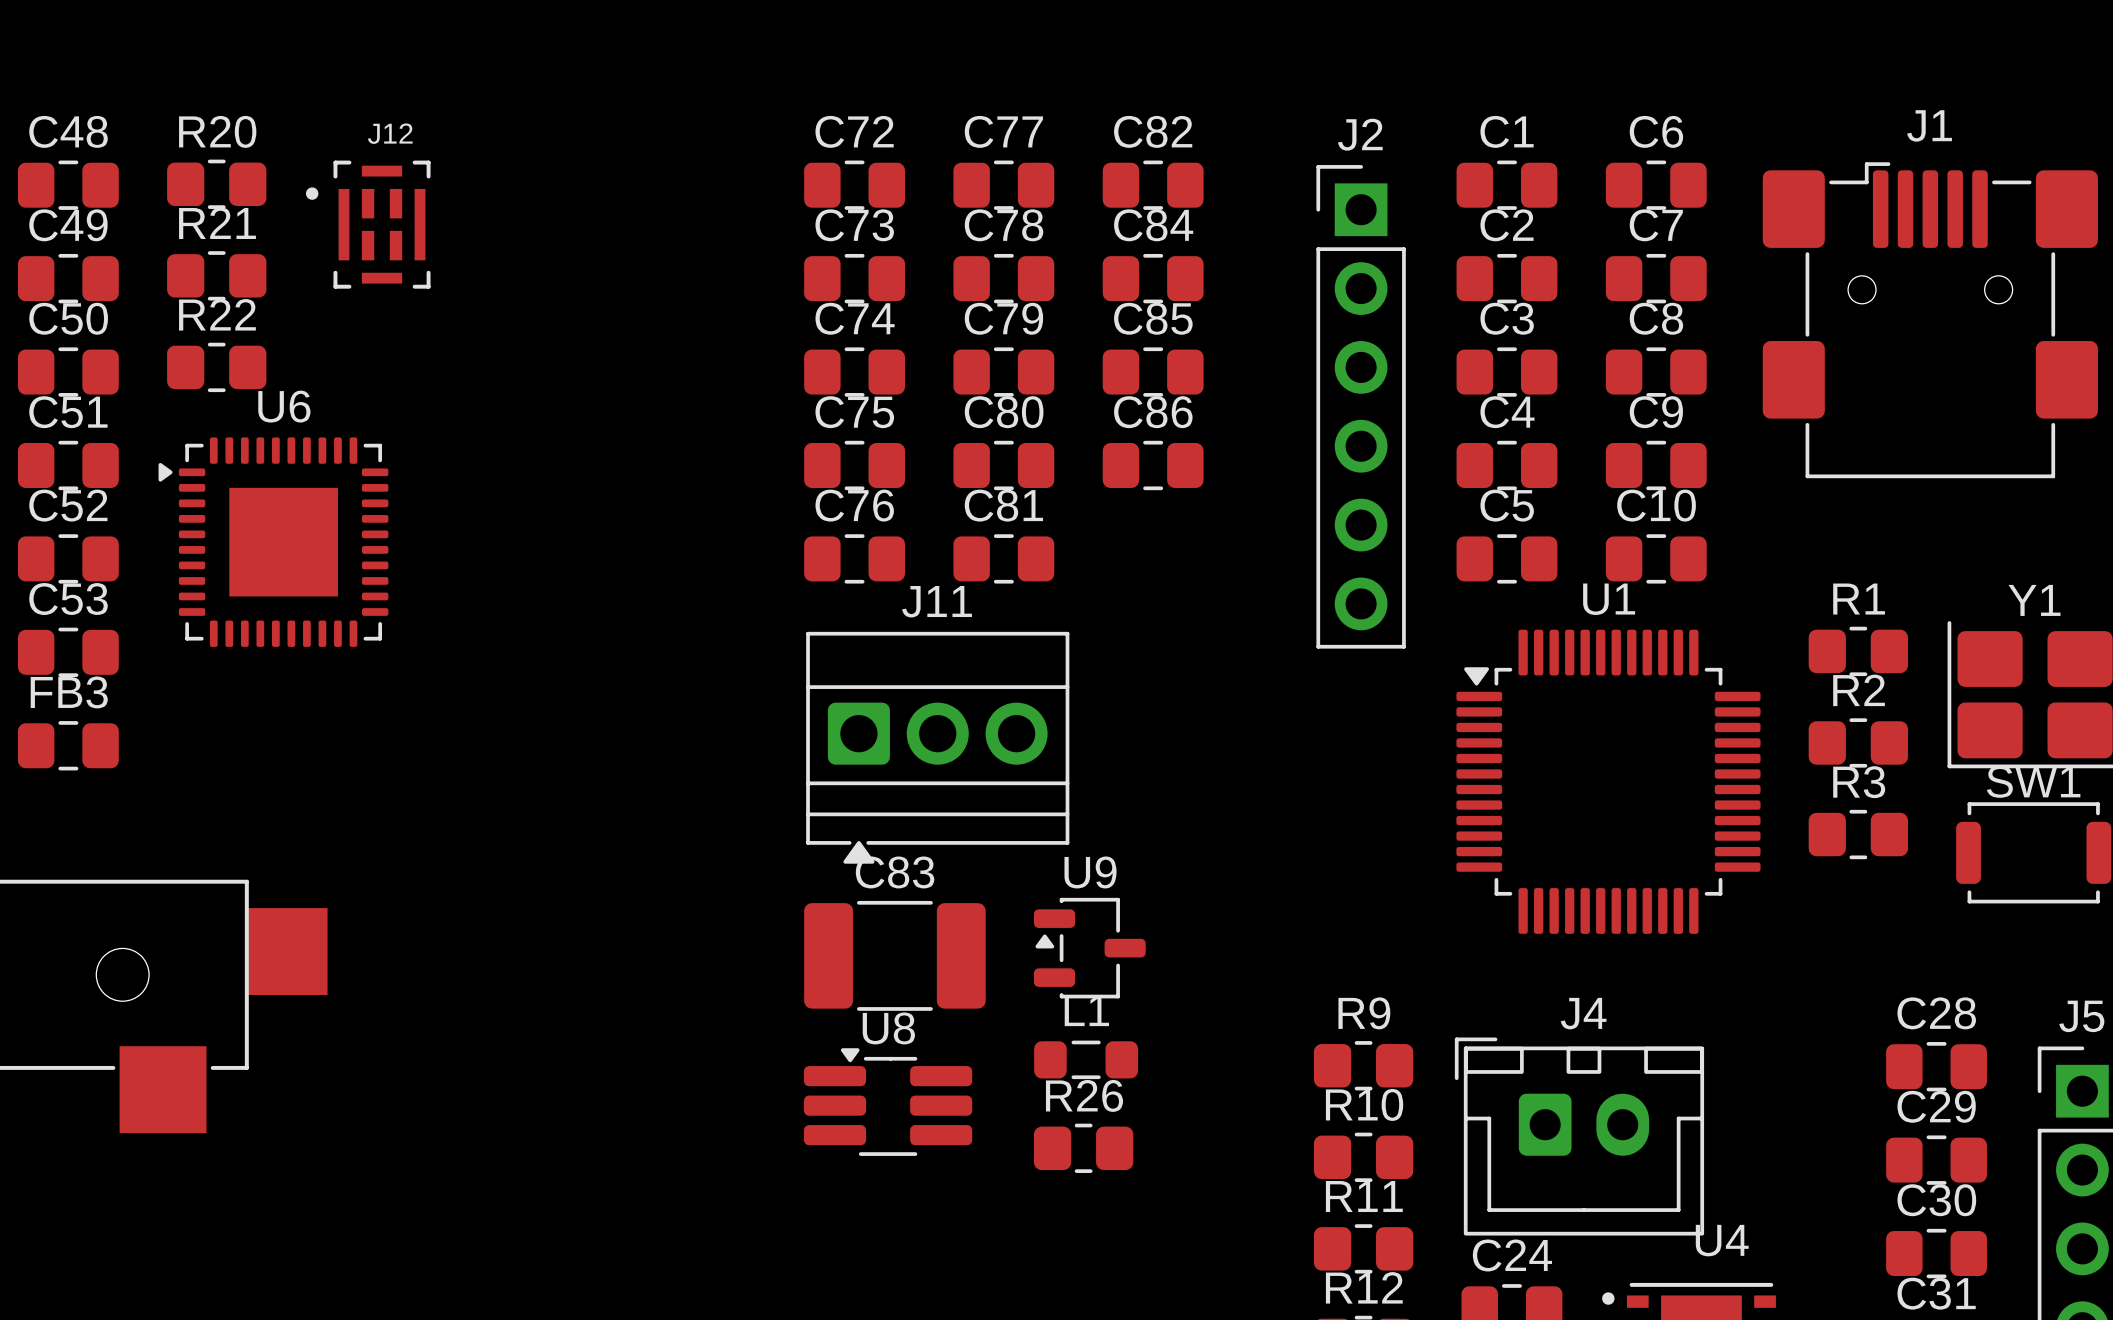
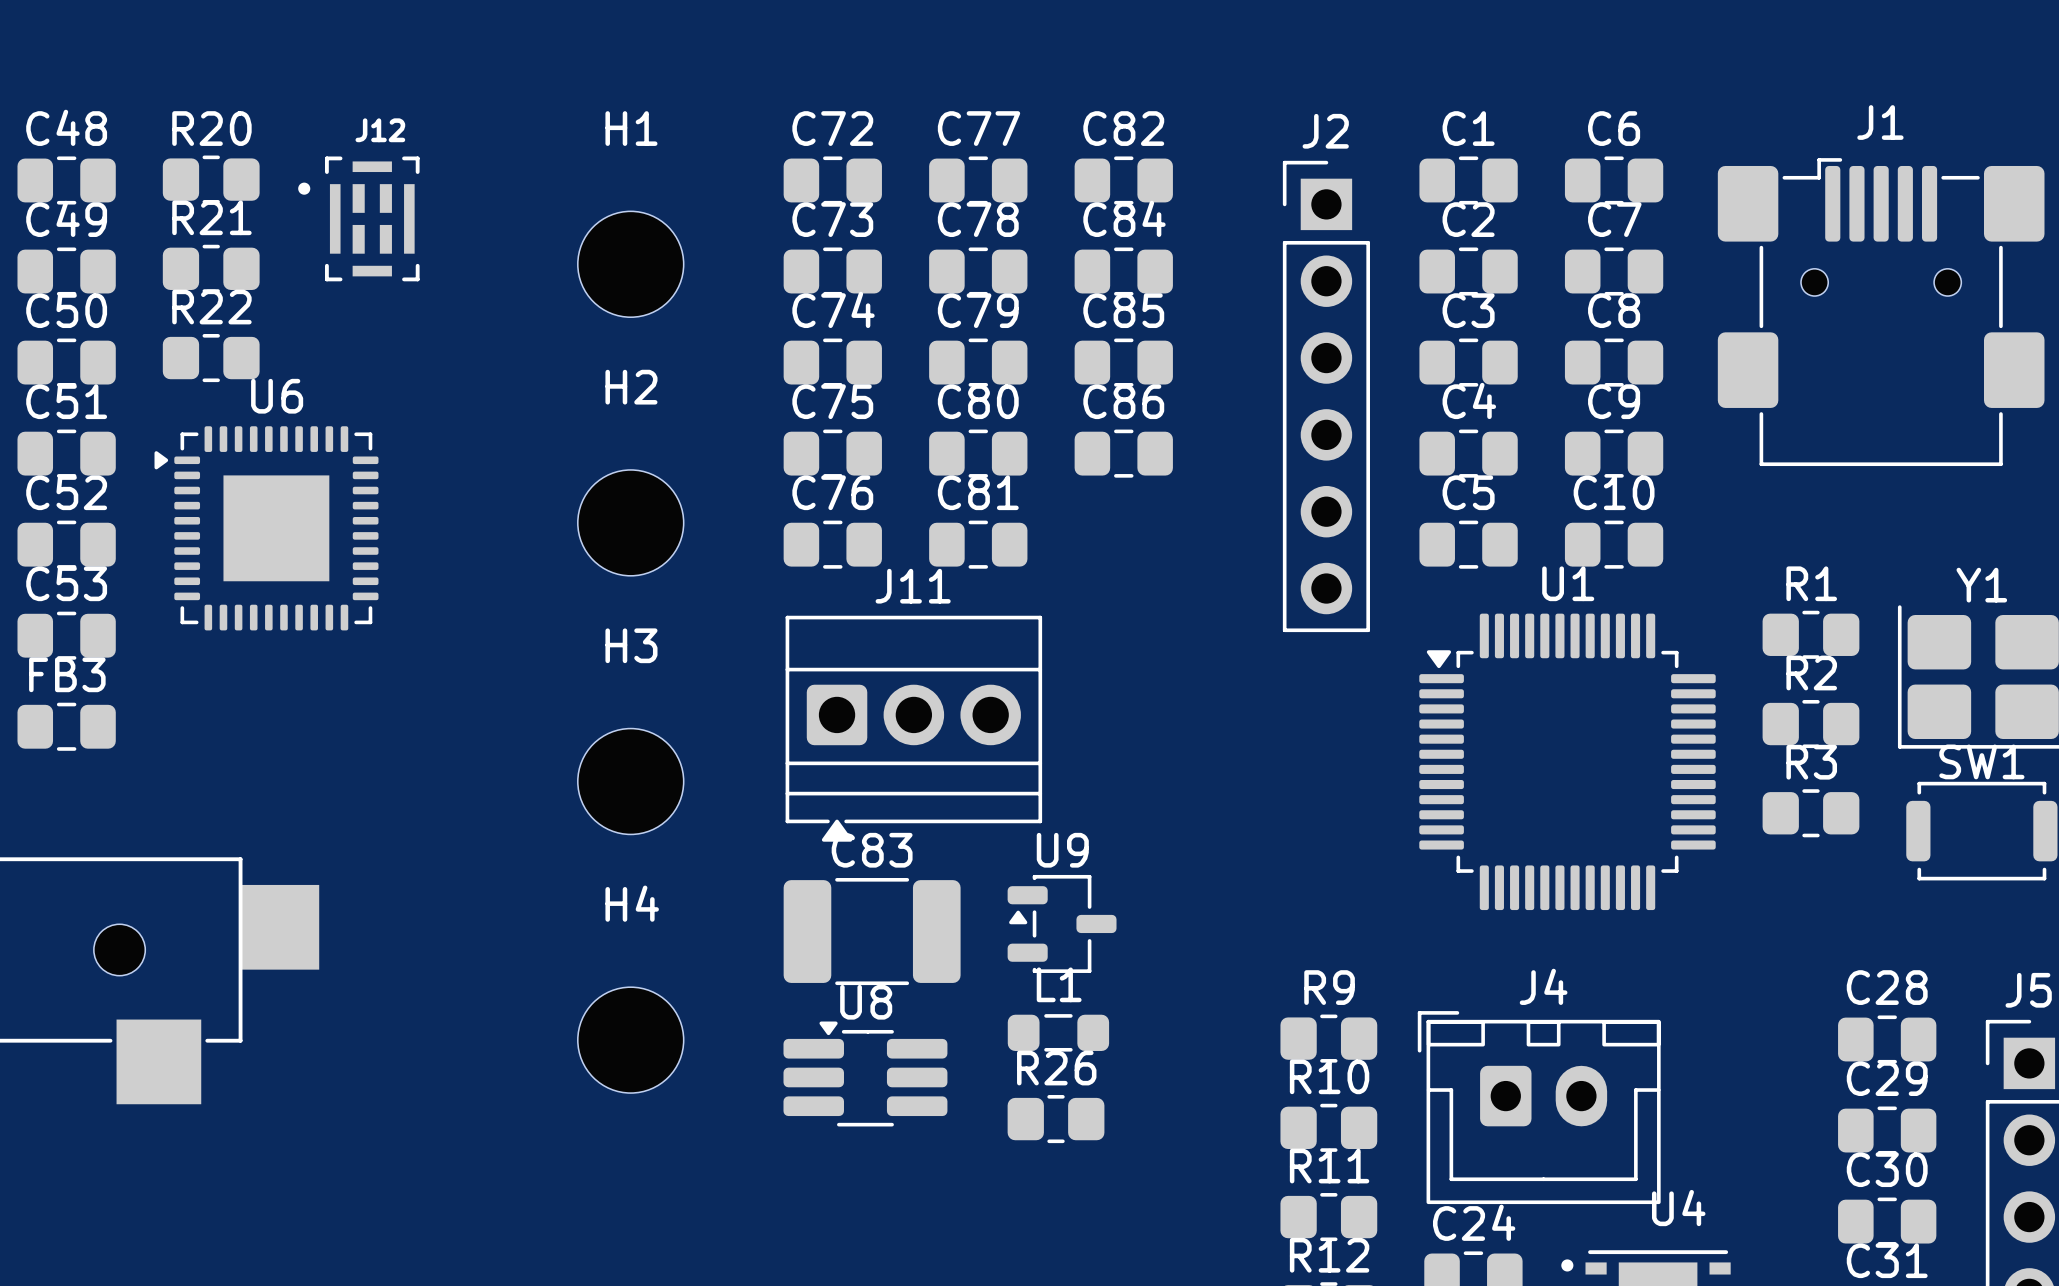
H1: none -> (630, 264)
H2: none -> (630, 522)
H3: none -> (630, 781)
H4: none -> (630, 1040)

